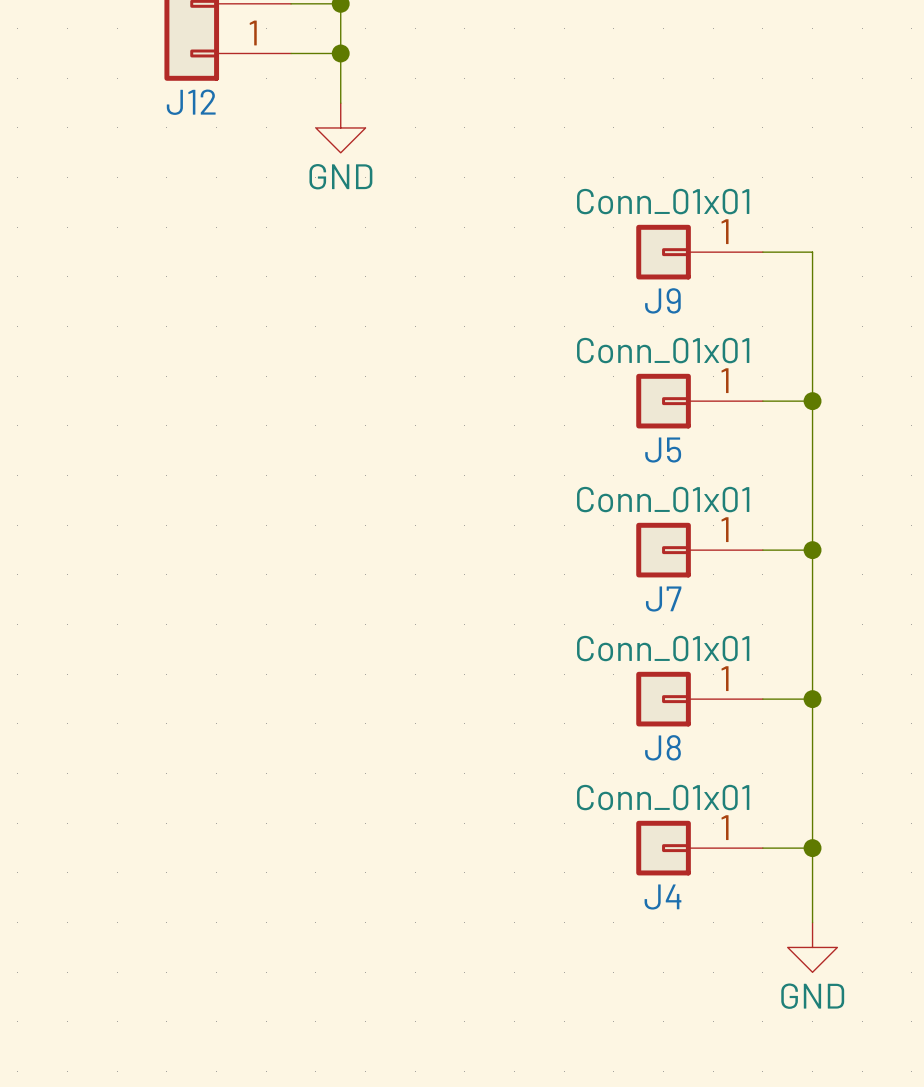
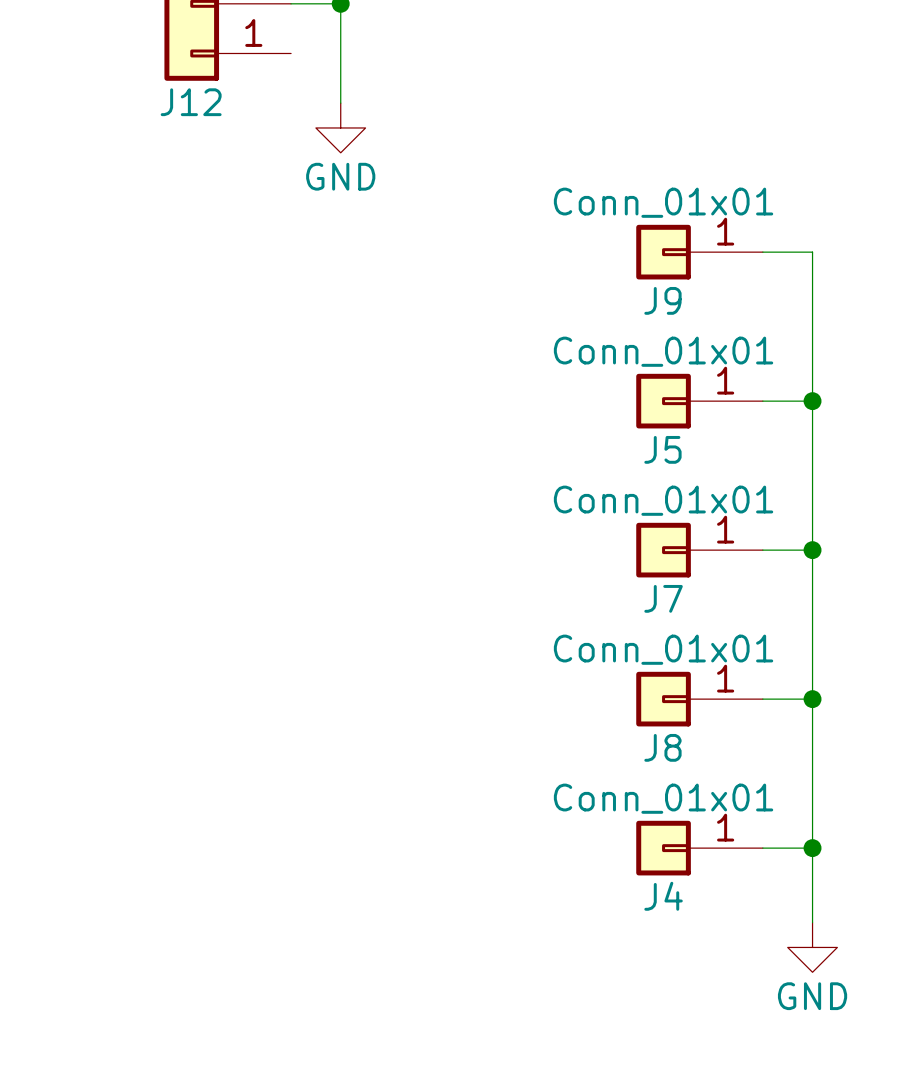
wire: (291, 53) (340, 53) -> none
junction: (340, 53) -> none

